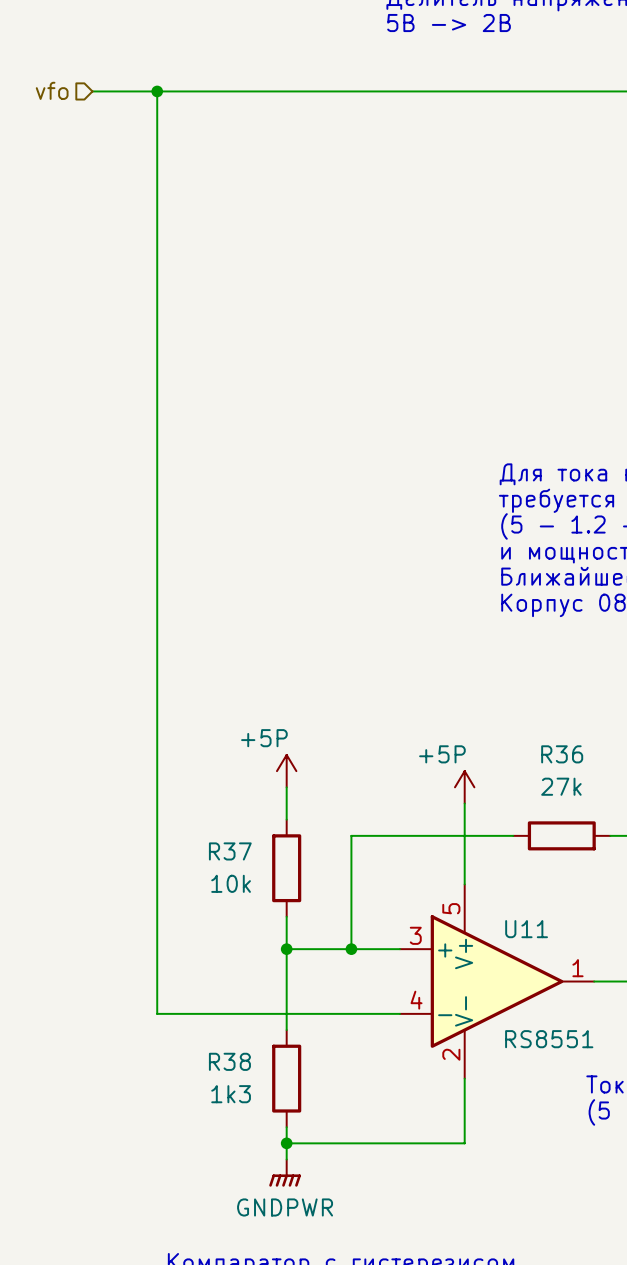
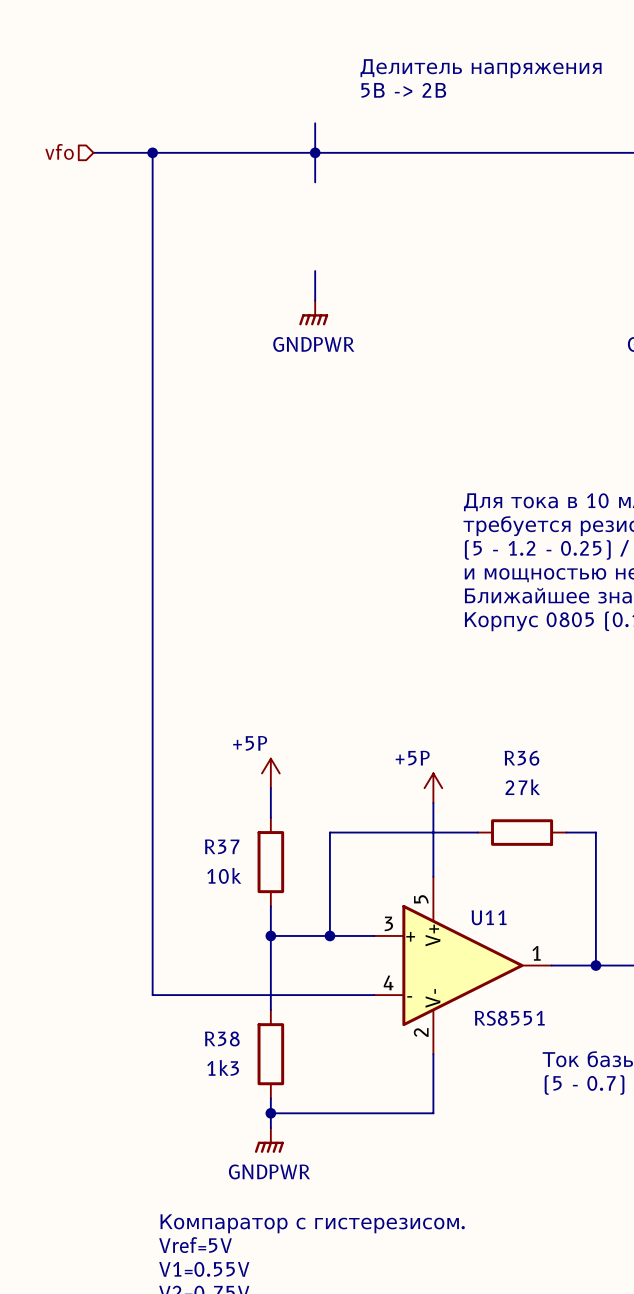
wire: none -> (315, 123) (315, 182)
junction: none -> (315, 152)
wire: none -> (315, 271) (315, 300)
power symbol: none -> GNDPWR (313, 313)

